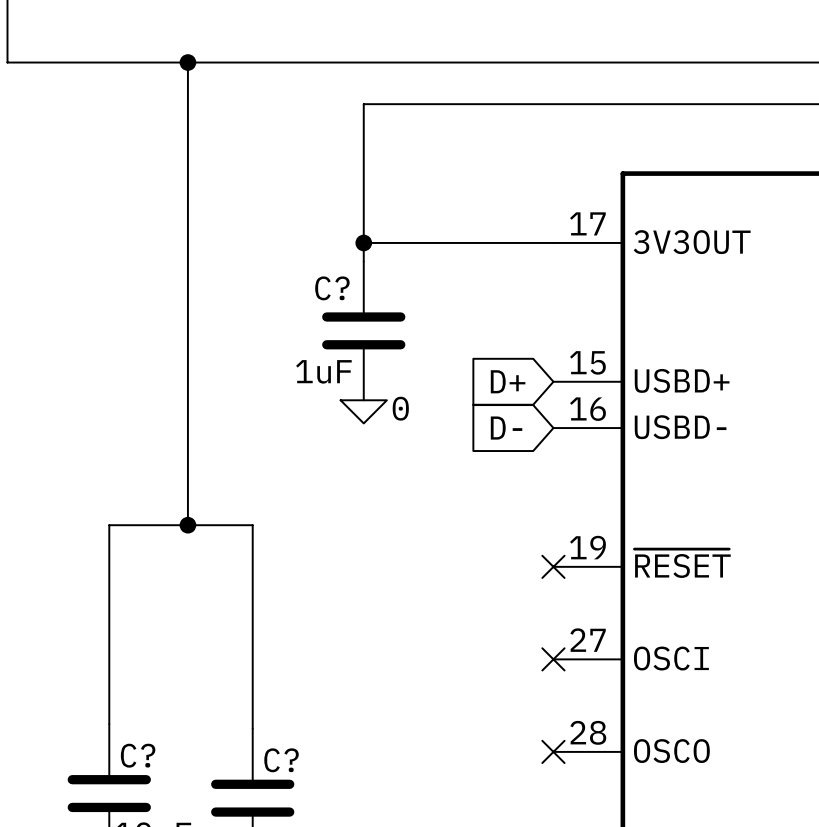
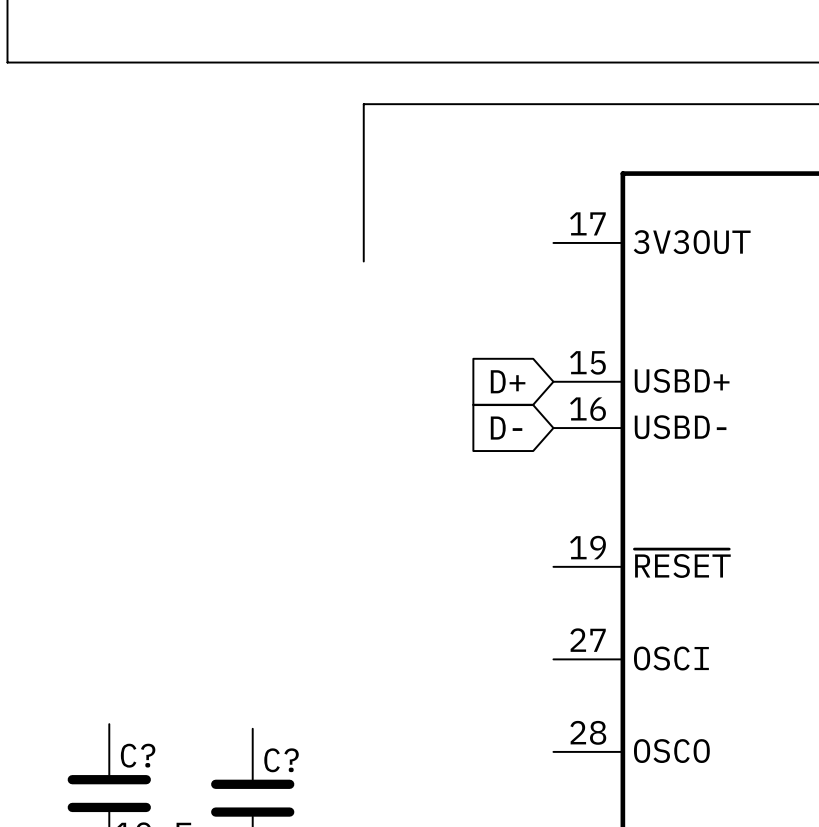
wire: (187, 62) (187, 525) -> none
junction: (187, 62) -> none
wire: (363, 242) (553, 242) -> none
junction: (363, 242) -> none
C?: 1uF (363, 330) -> none
power symbol: 0 (363, 411) -> none
junction: (187, 525) -> none
no-connect mark: (553, 566) -> none
no-connect mark: (553, 659) -> none
wire: (109, 724) (109, 525) (252, 525) (252, 728) -> none
no-connect mark: (553, 751) -> none

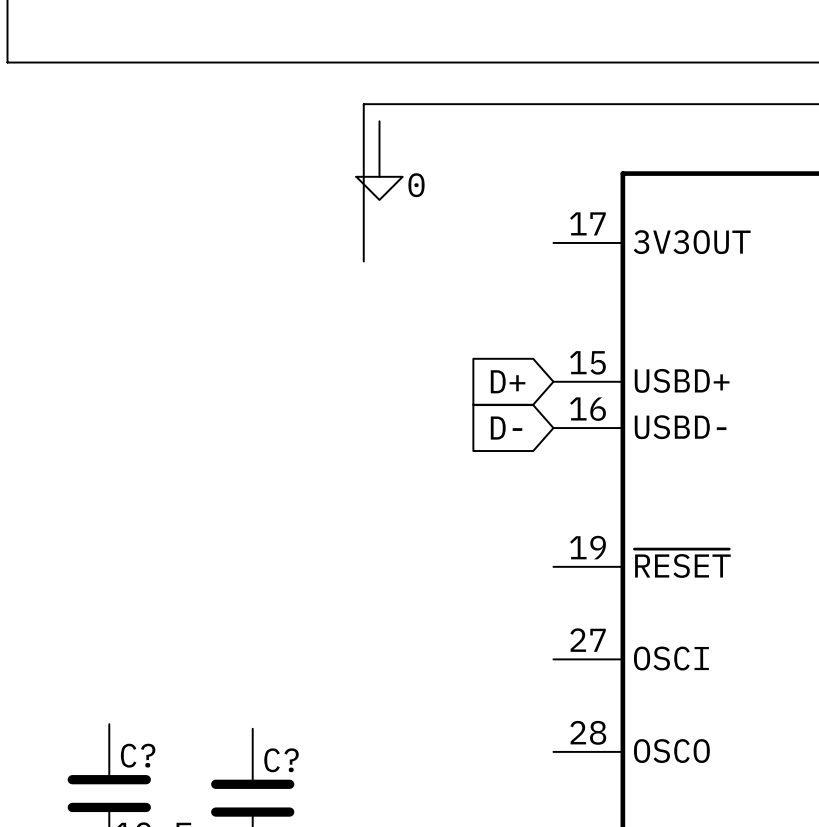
wire: none -> (379, 121) (379, 176)
power symbol: none -> 0 (379, 188)

